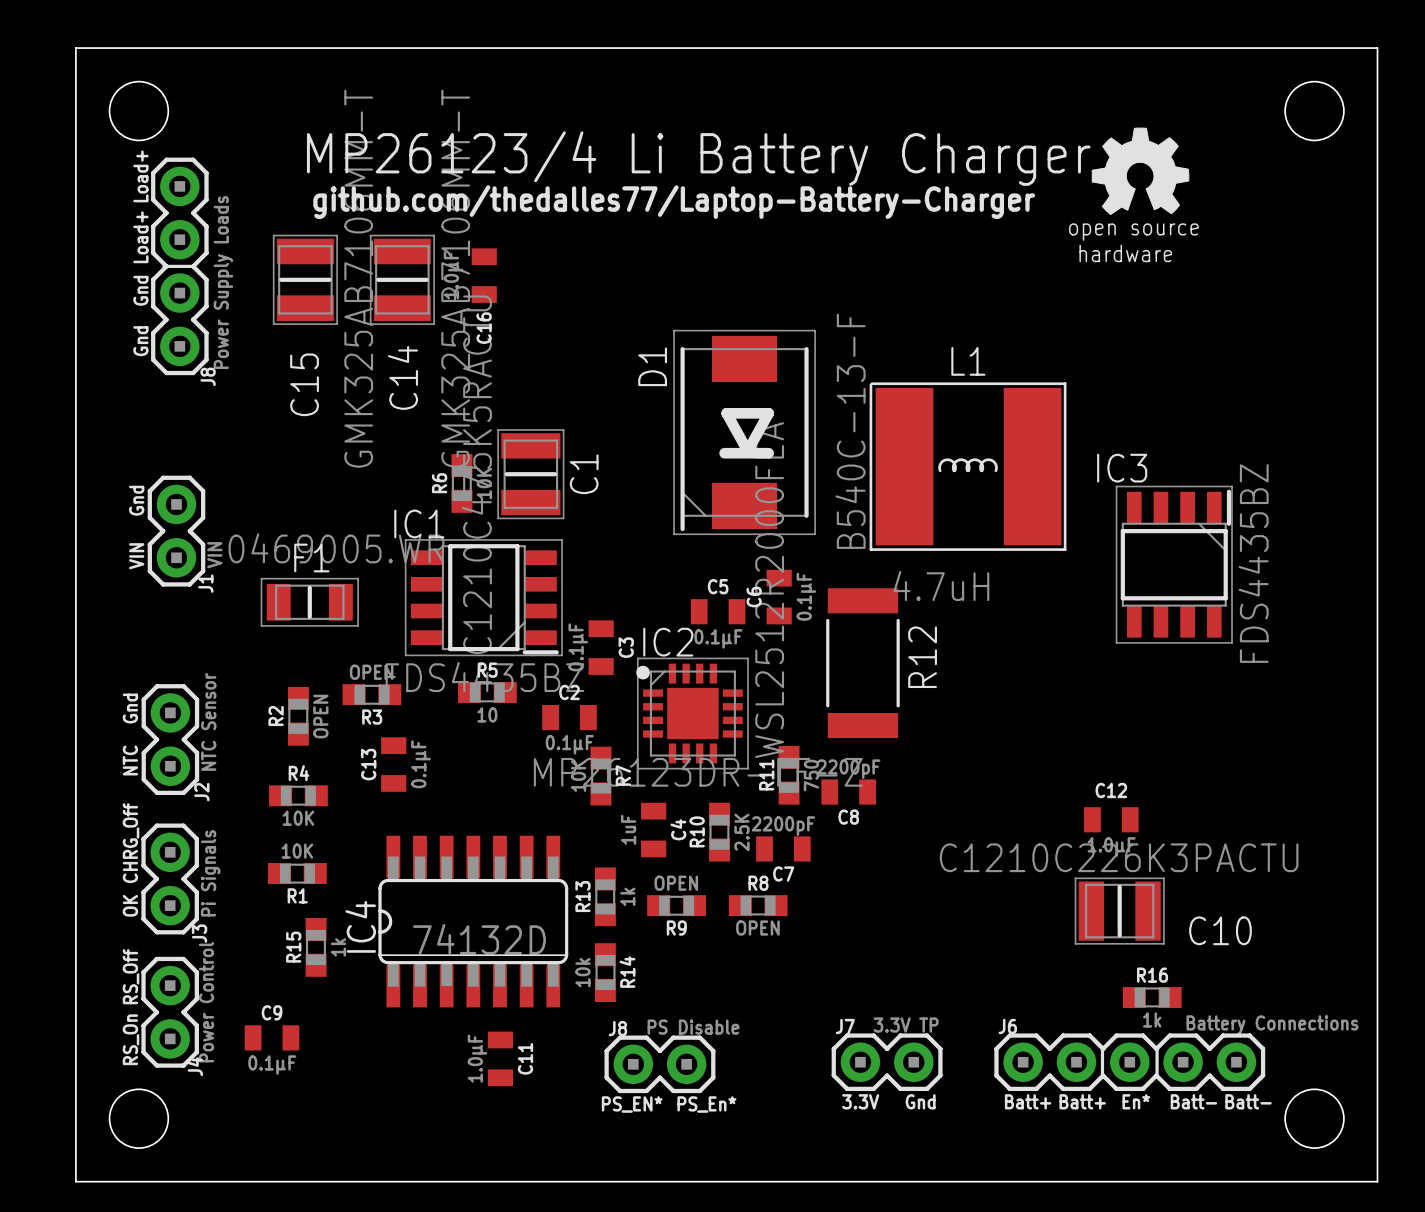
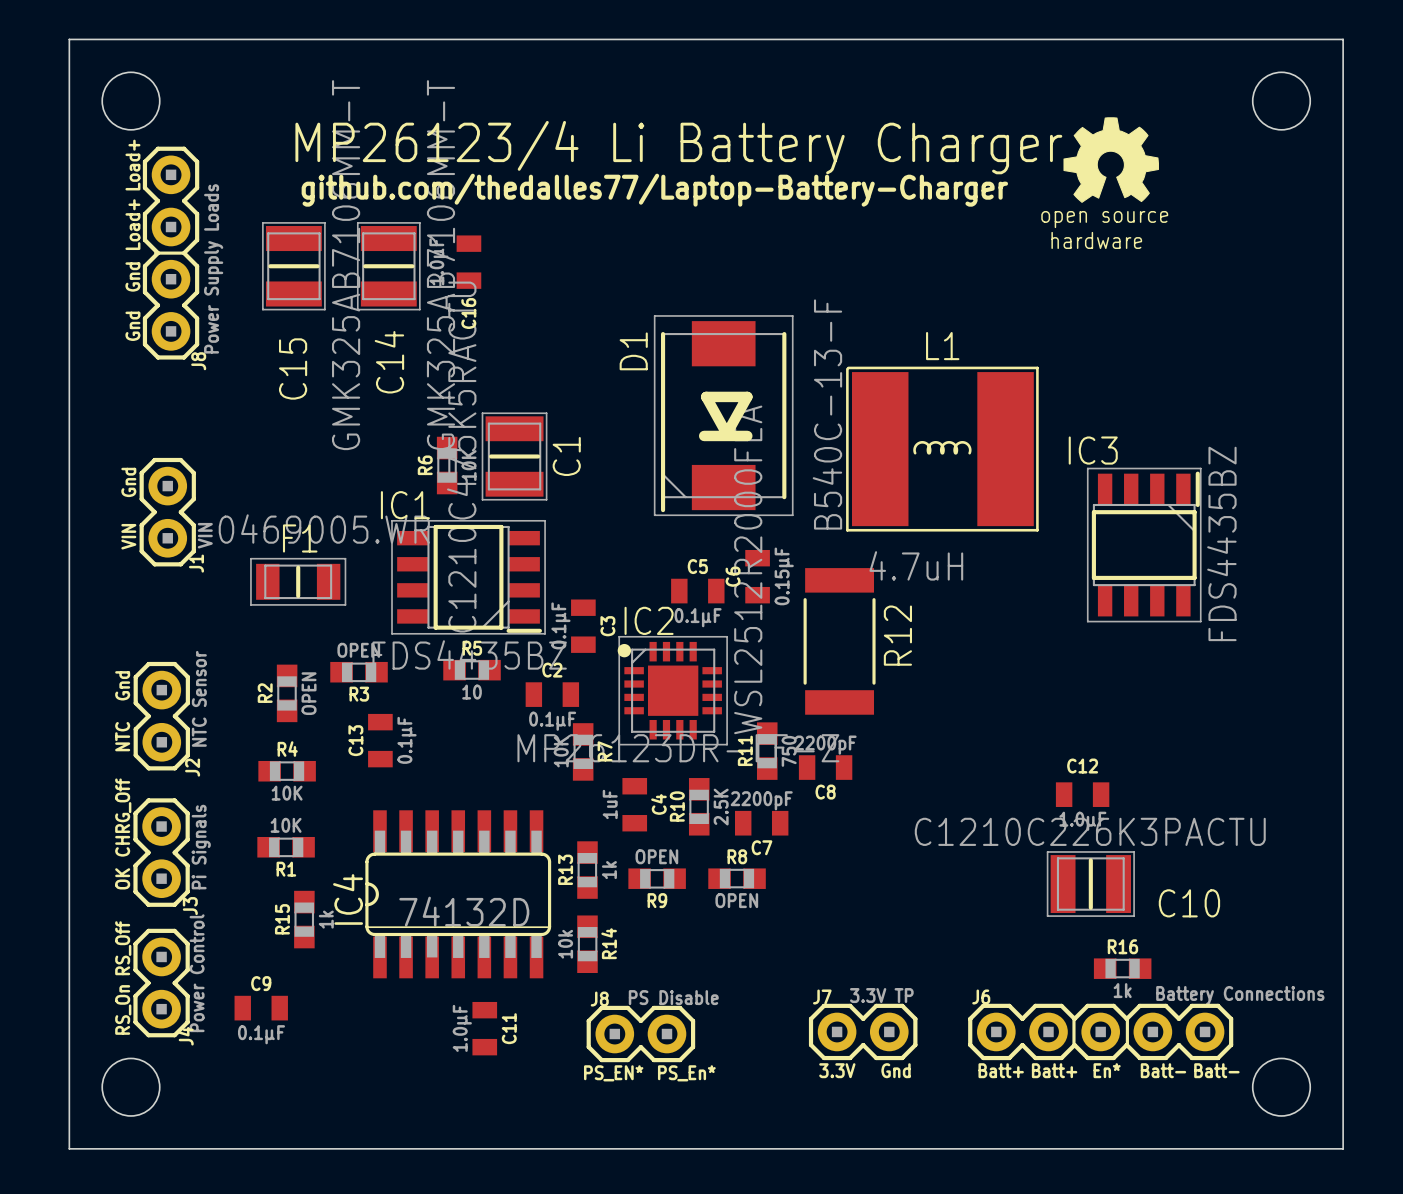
C6 value: 0.1µF (806, 596) -> 0.15µF (784, 576)

